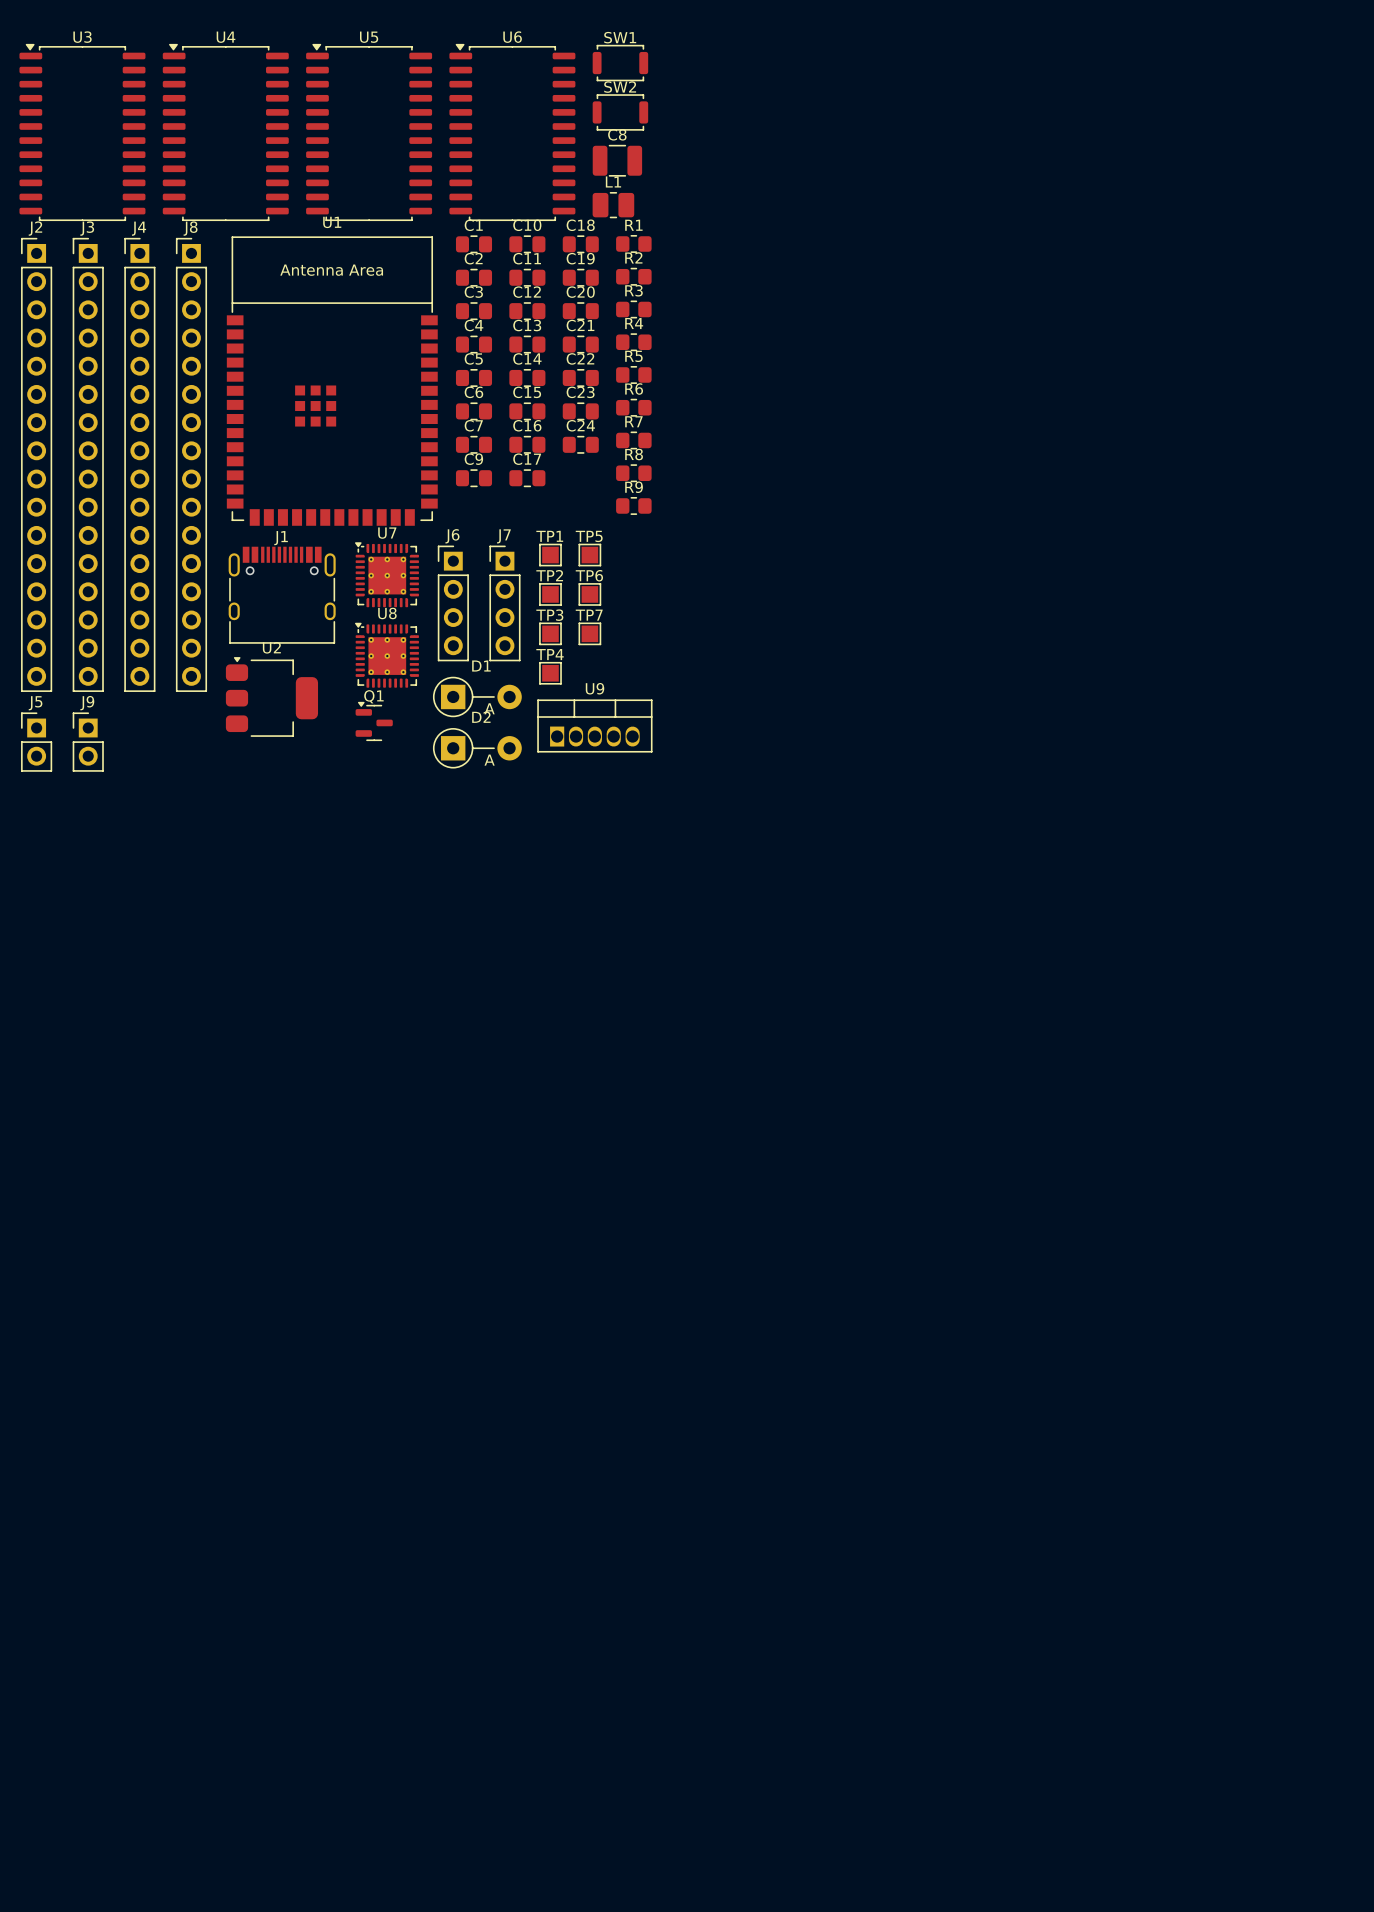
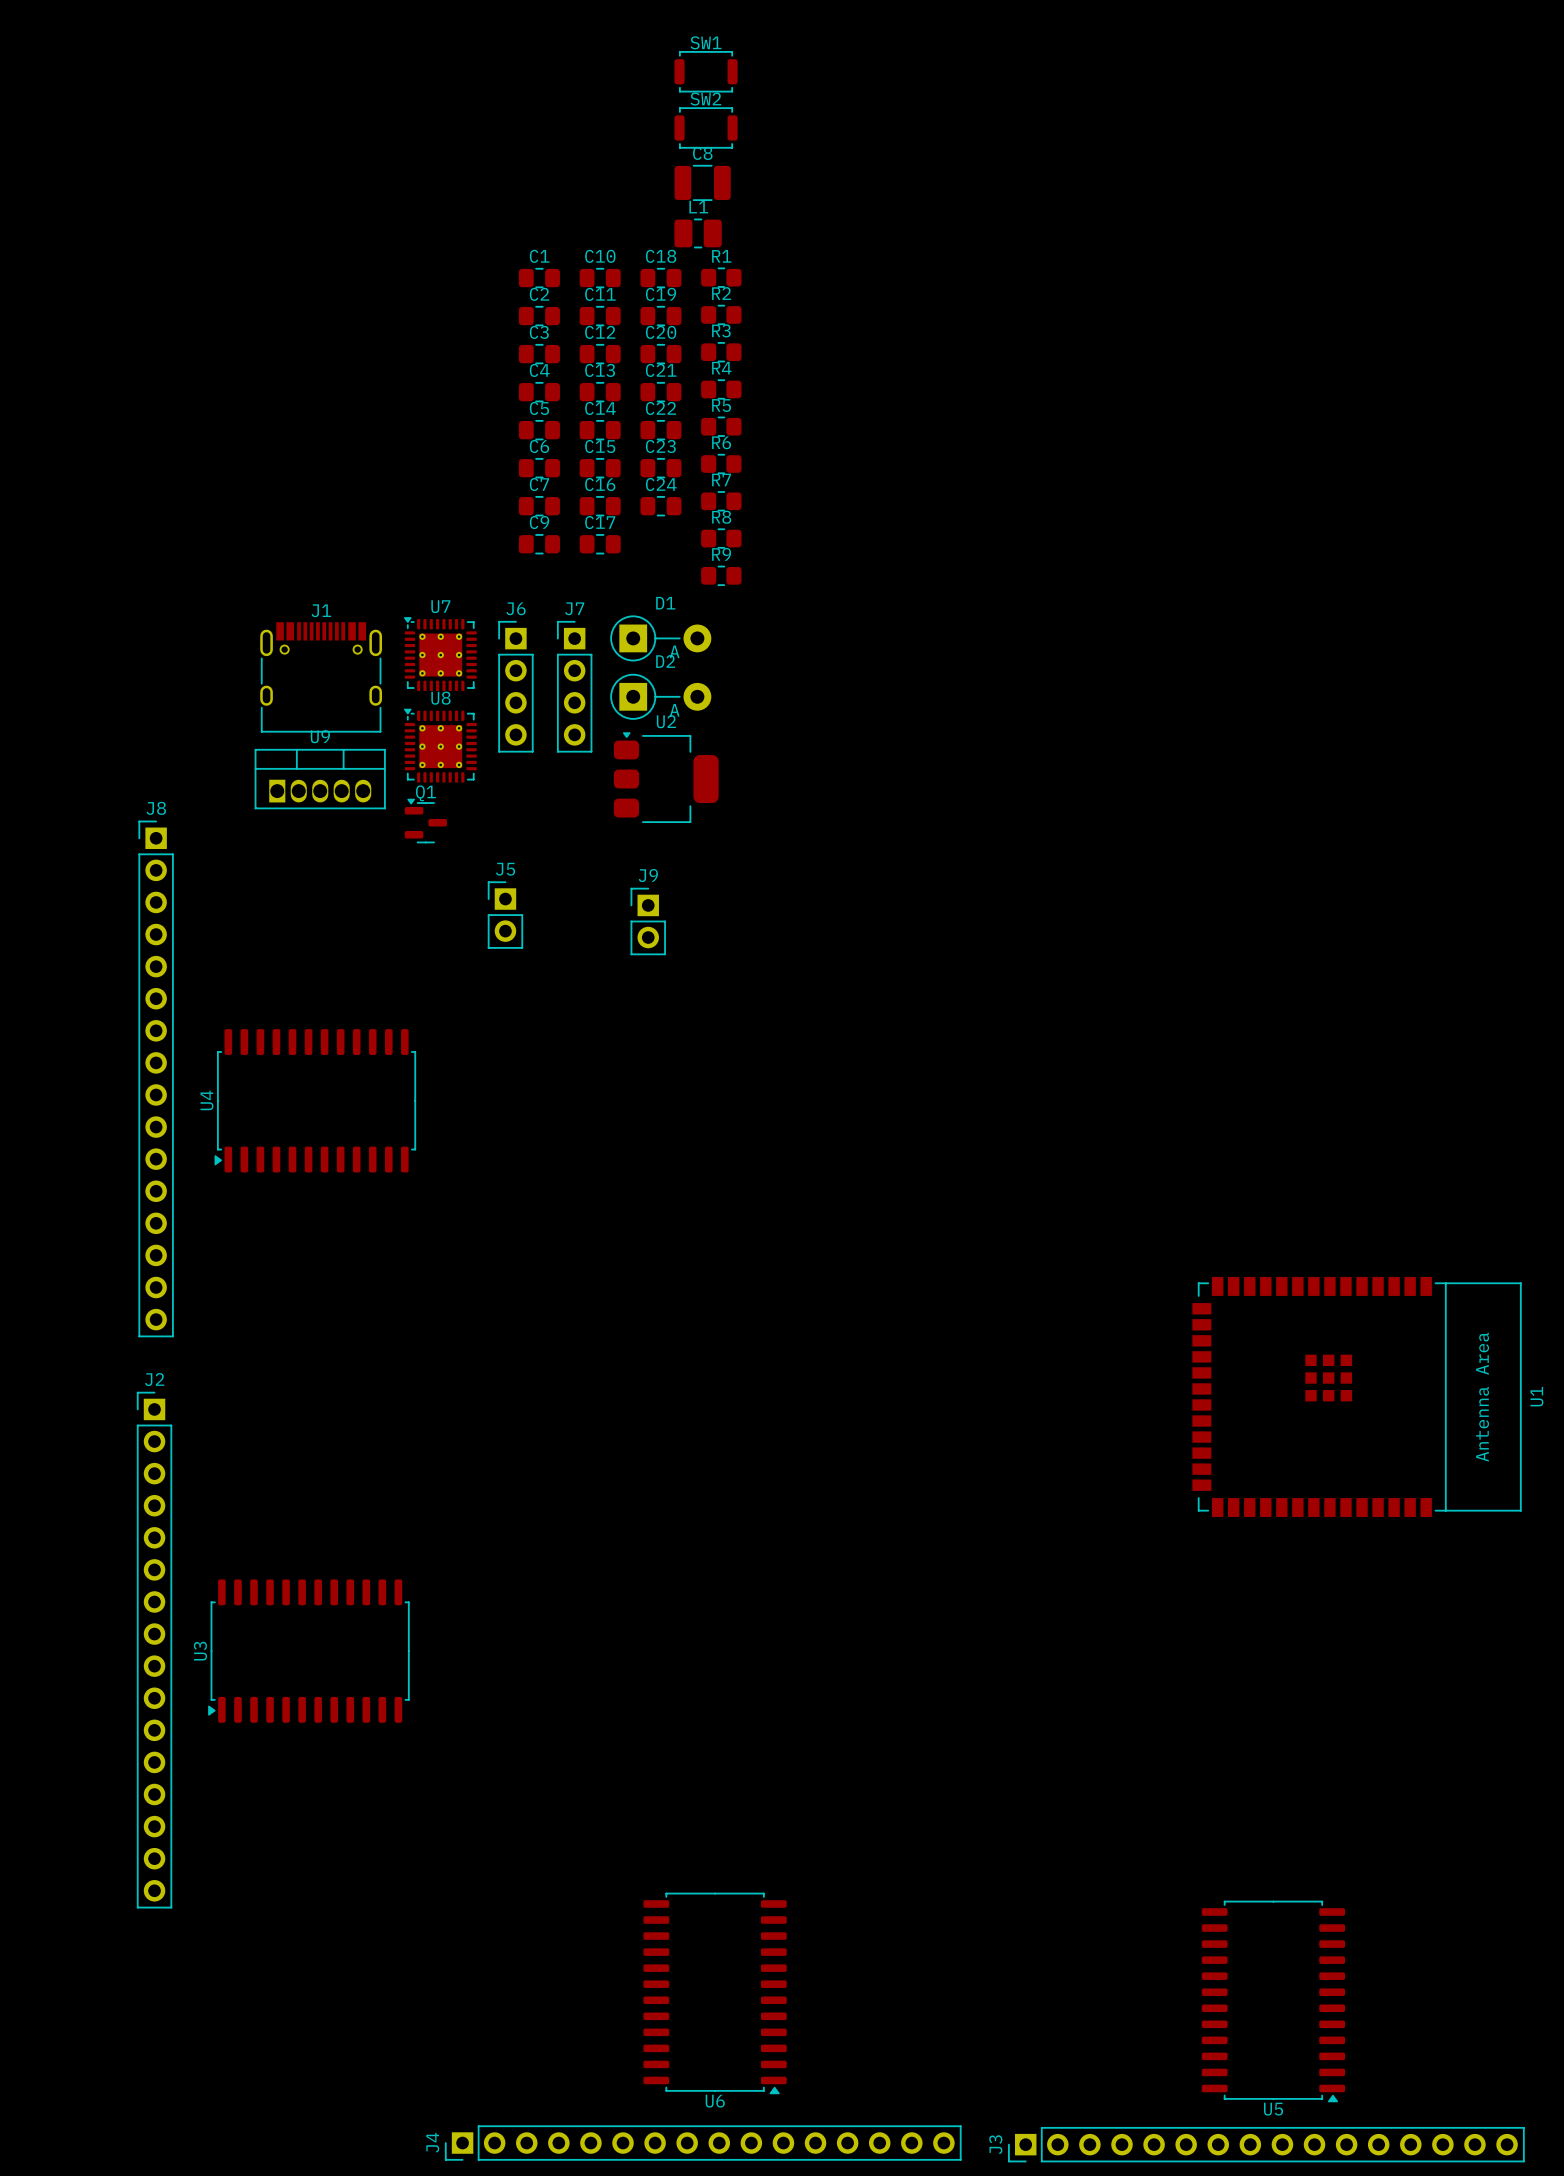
U3 rotation: 0° (82, 132) -> 90° counterclockwise (308, 1651)
U3 position: (82, 132) -> (308, 1651)
U4 rotation: 0° (225, 132) -> 90° counterclockwise (315, 1100)
U4 position: (225, 132) -> (315, 1100)
U5 rotation: 0° (369, 132) -> 180° (1273, 2001)
U5 position: (369, 132) -> (1273, 2001)
U6 rotation: 0° (512, 132) -> 180° (715, 1993)
U6 position: (512, 132) -> (715, 1993)
U1 rotation: 0° (332, 381) -> 90° clockwise (1356, 1396)
U1 position: (332, 381) -> (1356, 1396)
J2 position: (36, 464) -> (154, 1650)
J3 rotation: 0° (88, 464) -> 90° counterclockwise (1266, 2144)
J3 position: (88, 464) -> (1266, 2144)
J4 rotation: 0° (139, 464) -> 90° counterclockwise (703, 2143)
J4 position: (139, 464) -> (703, 2143)
J8 position: (191, 464) -> (156, 1078)
TP1: (550, 555) -> none
TP5: (589, 555) -> none
TP2: (550, 594) -> none
TP6: (589, 594) -> none
TP3: (550, 633) -> none
TP7: (589, 633) -> none
TP4: (550, 673) -> none
U2 position: (271, 696) -> (666, 777)
D1 position: (477, 696) -> (660, 638)
U9 position: (594, 726) -> (320, 779)
J5 position: (36, 742) -> (505, 915)
J9 position: (88, 742) -> (648, 921)
D2 position: (477, 748) -> (660, 696)

